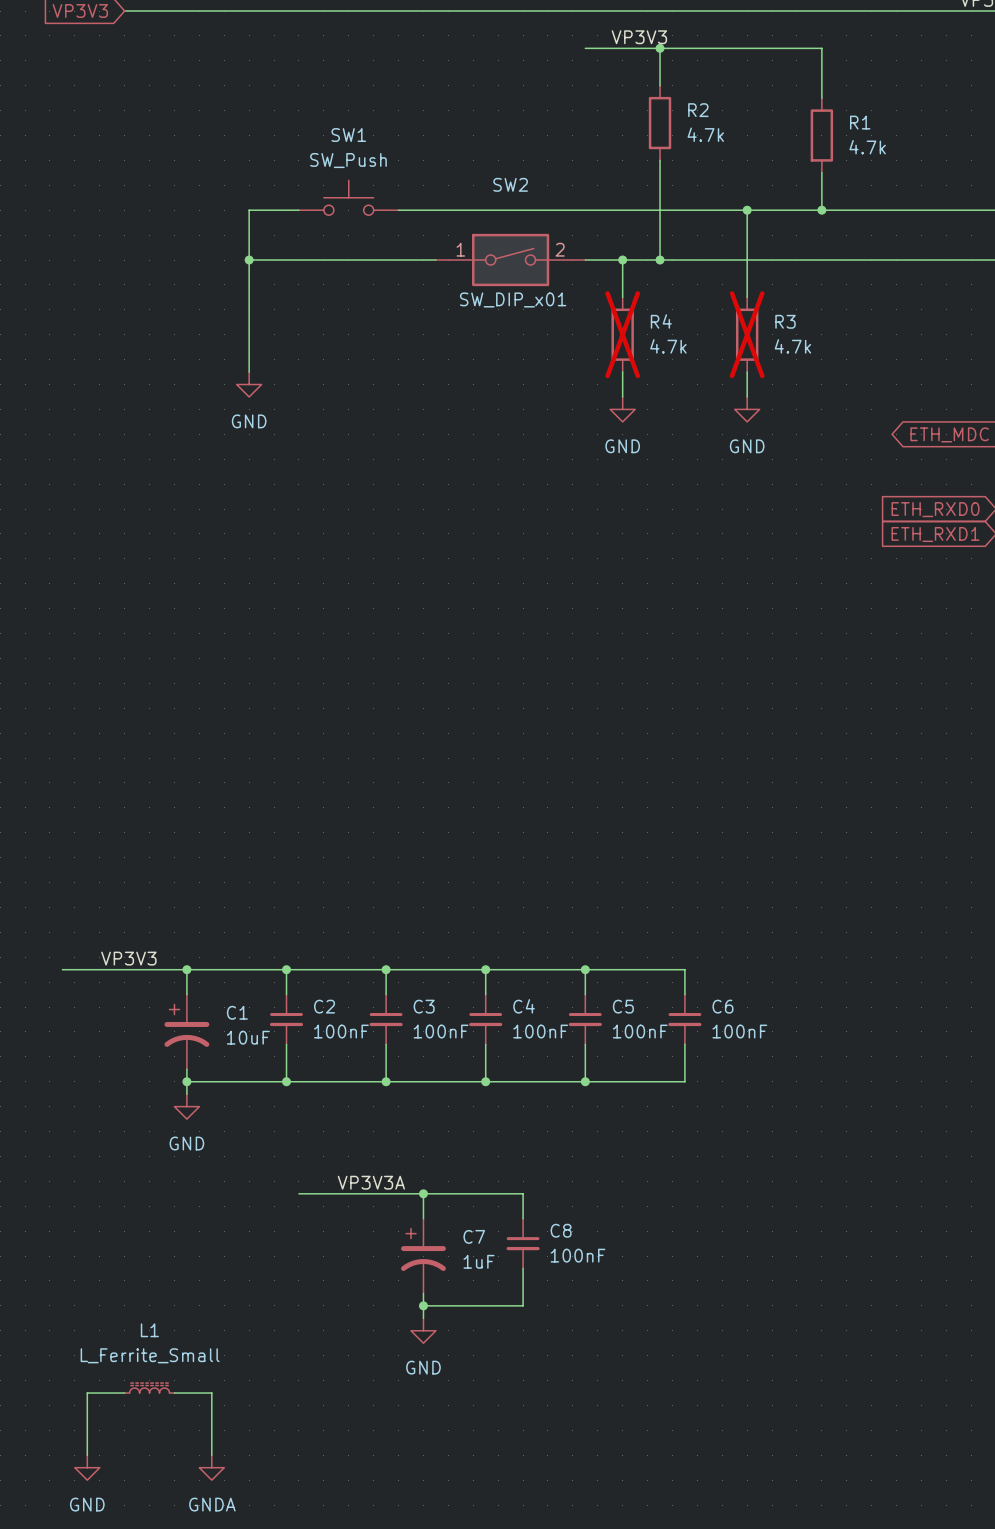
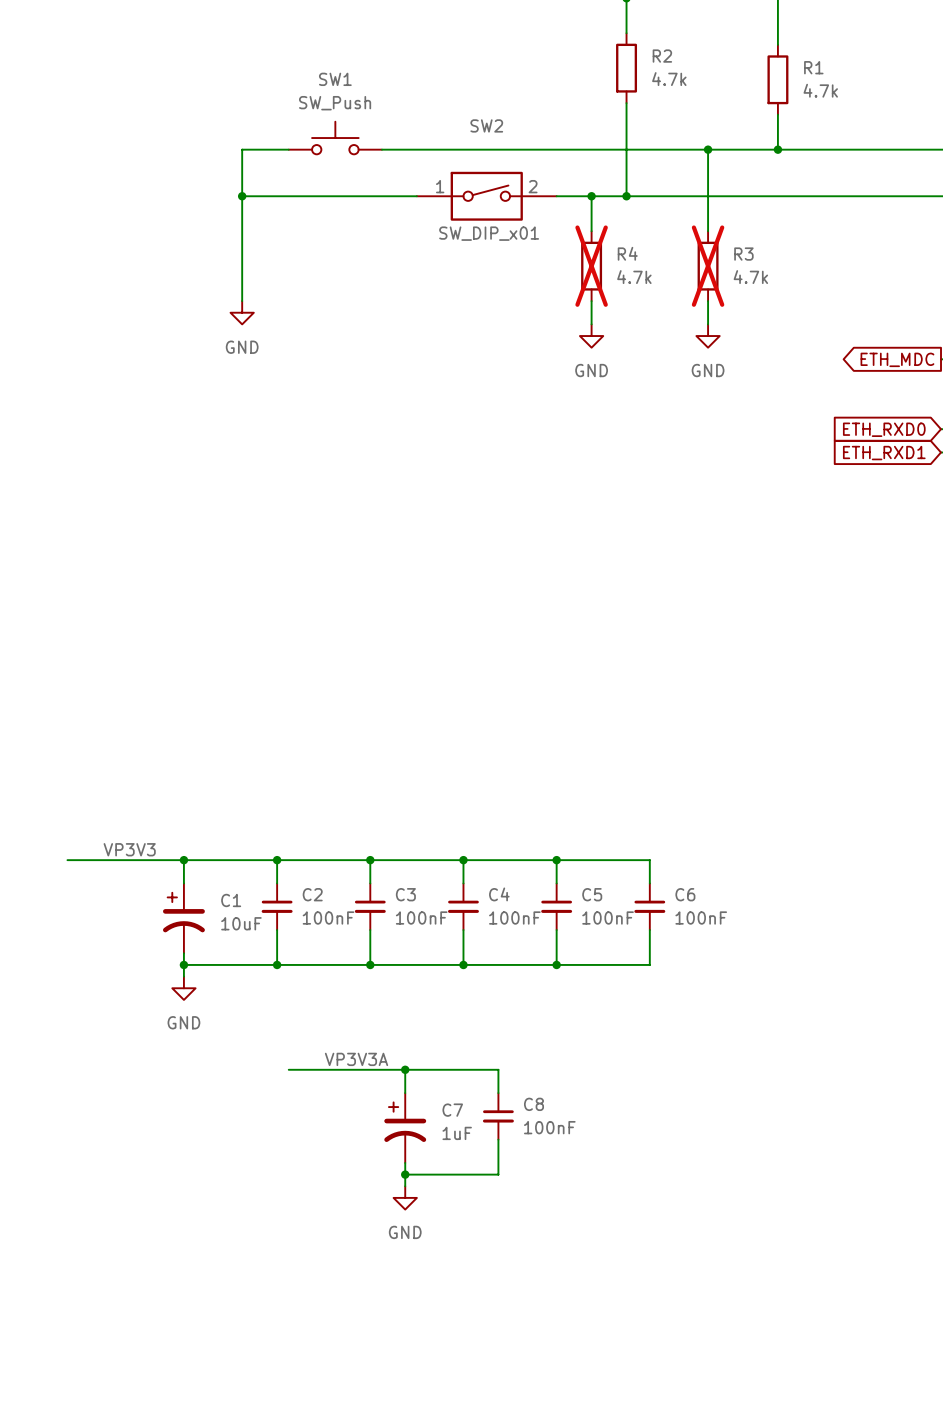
L1: L_Ferrite_Small (149, 1388) -> none
wire: (124, 1393) (87, 1393) (87, 1455) -> none
wire: (174, 1393) (211, 1393) (211, 1455) -> none
power symbol: GND (87, 1467) -> none
power symbol: GNDA (211, 1467) -> none

